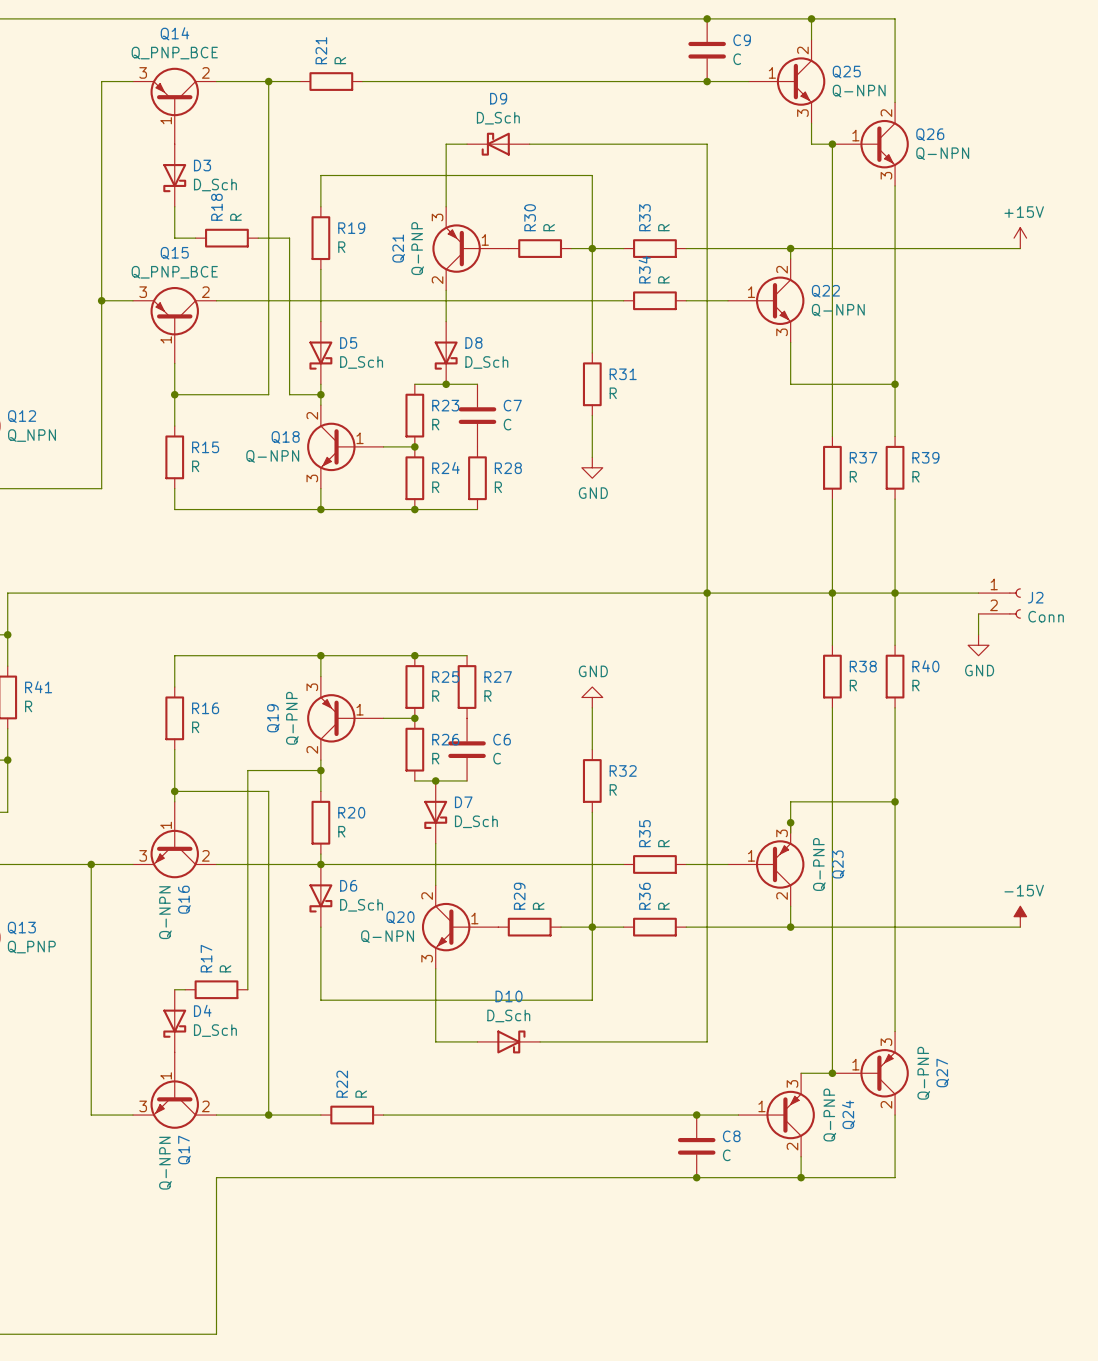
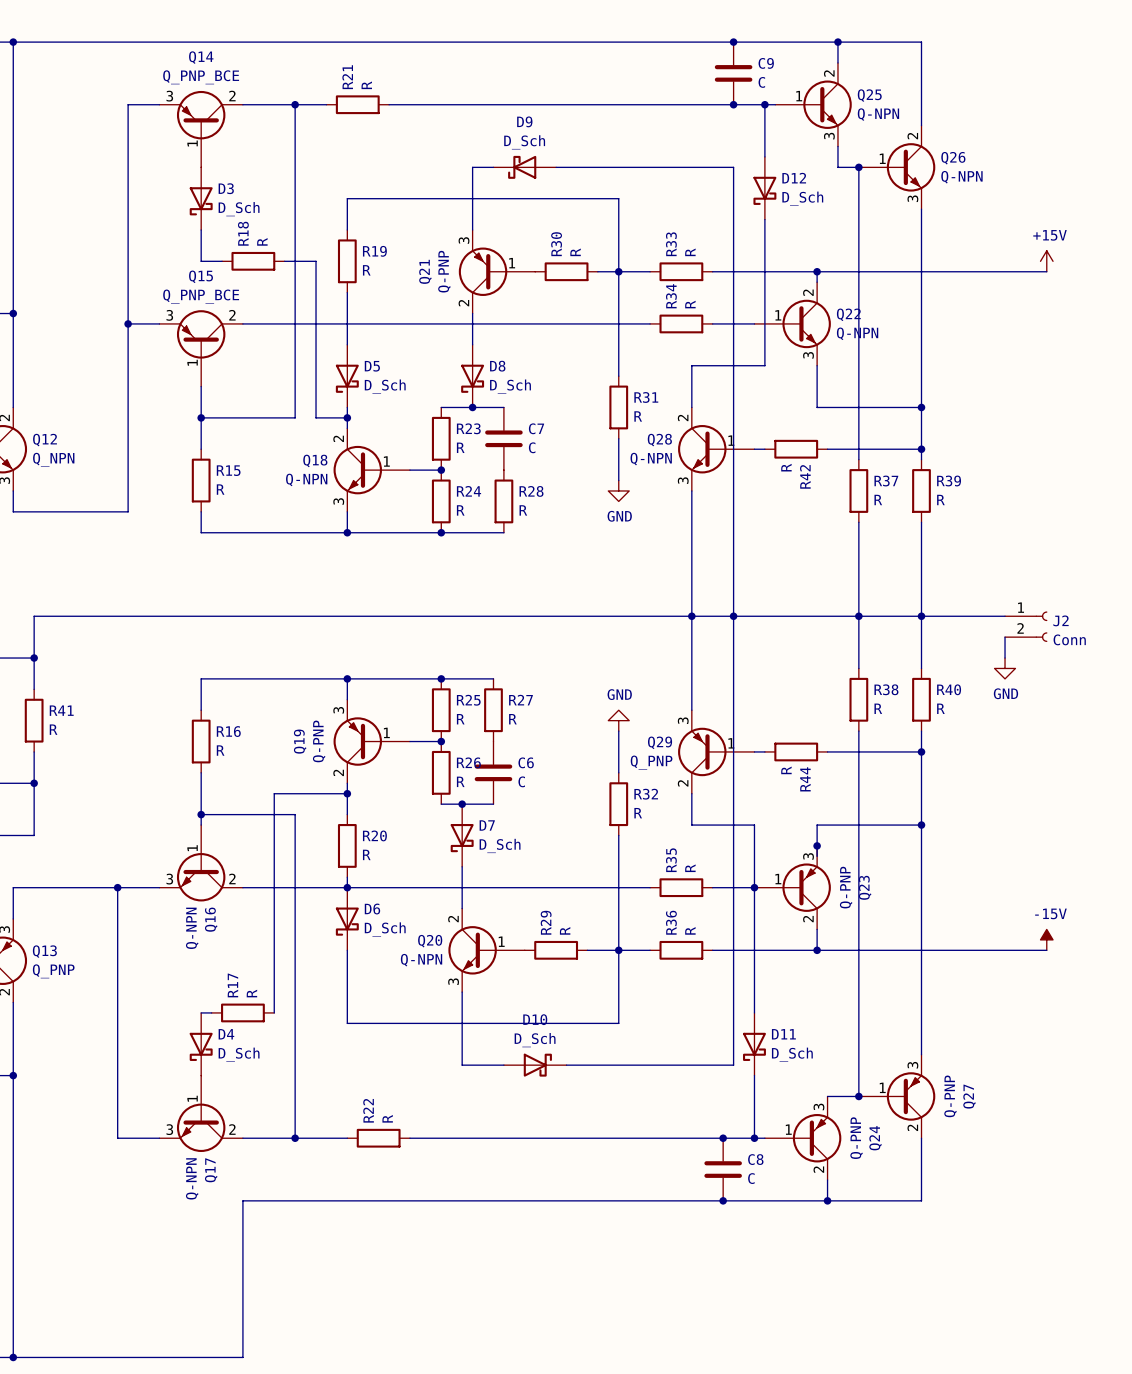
wire: none -> (764, 104) (764, 156)
junction: none -> (764, 104)
D12: none -> D_Sch (764, 188)
wire: none -> (764, 219) (764, 365) (691, 365) (691, 407)
Q28: none -> Q-NPN (716, 449)
wire: none -> (754, 449) (764, 449)
R42: none -> R (796, 449)
wire: none -> (827, 449) (921, 449)
junction: none -> (921, 449)
wire: none -> (691, 490) (691, 710)
junction: none -> (691, 616)
Q29: none -> Q_PNP (716, 751)
wire: none -> (754, 751) (764, 751)
R44: none -> R (796, 751)
wire: none -> (827, 751) (921, 751)
junction: none -> (921, 751)
wire: none -> (691, 793) (691, 825) (754, 825) (754, 1012)
junction: none -> (754, 887)
D11: none -> D_Sch (754, 1044)
wire: none -> (754, 1075) (754, 1138)
junction: none -> (754, 1138)

